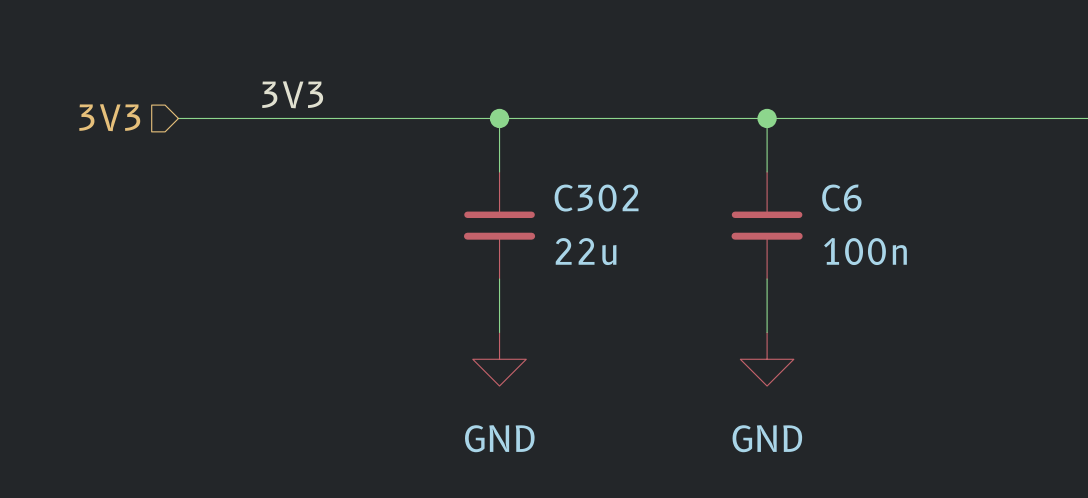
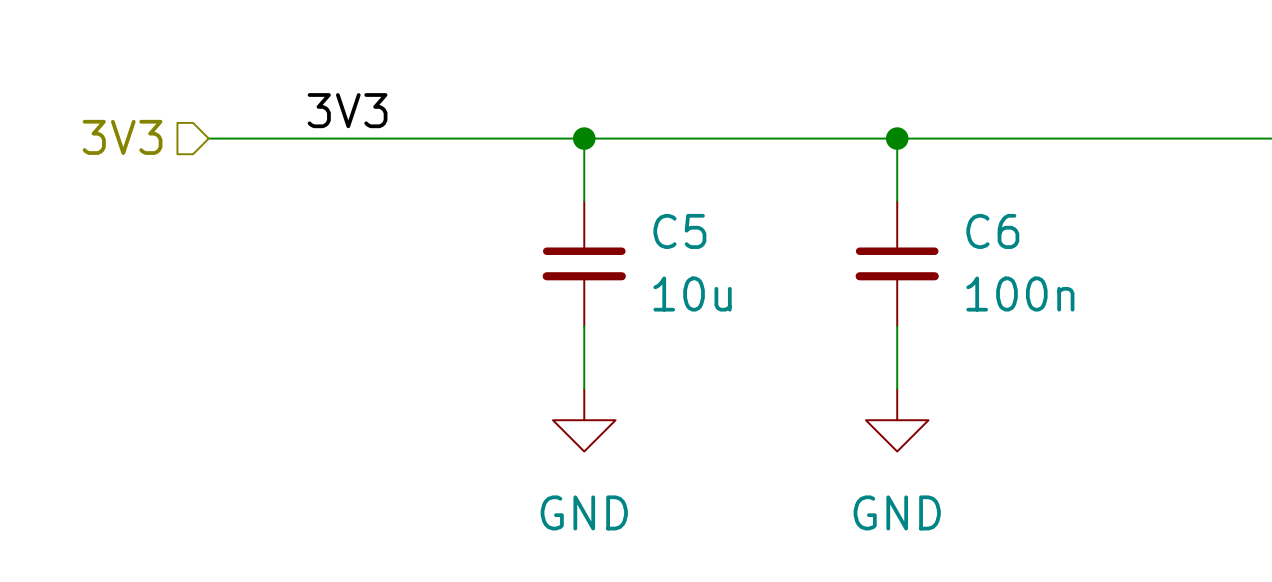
C302 name: C302 (596, 198) -> C5 (679, 231)
C302 value: 22u (586, 251) -> 10u (692, 294)

